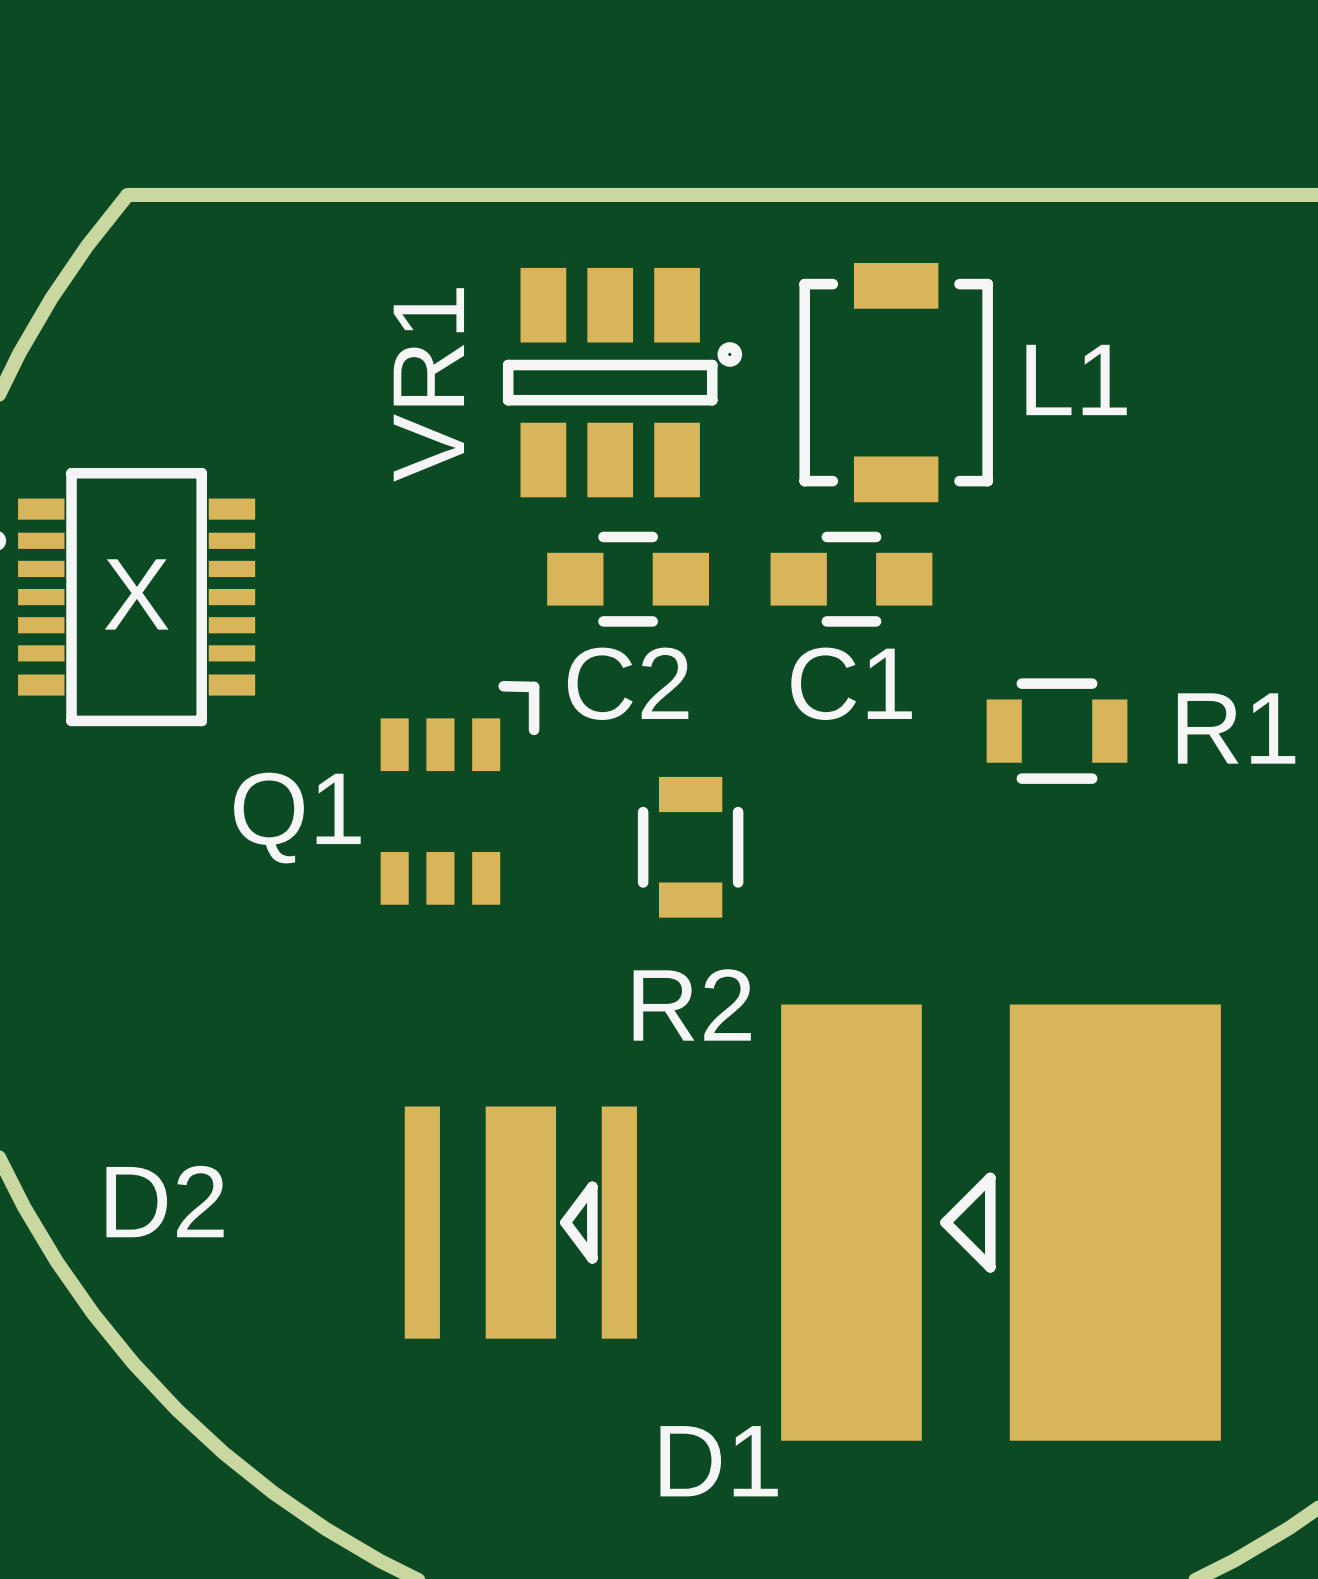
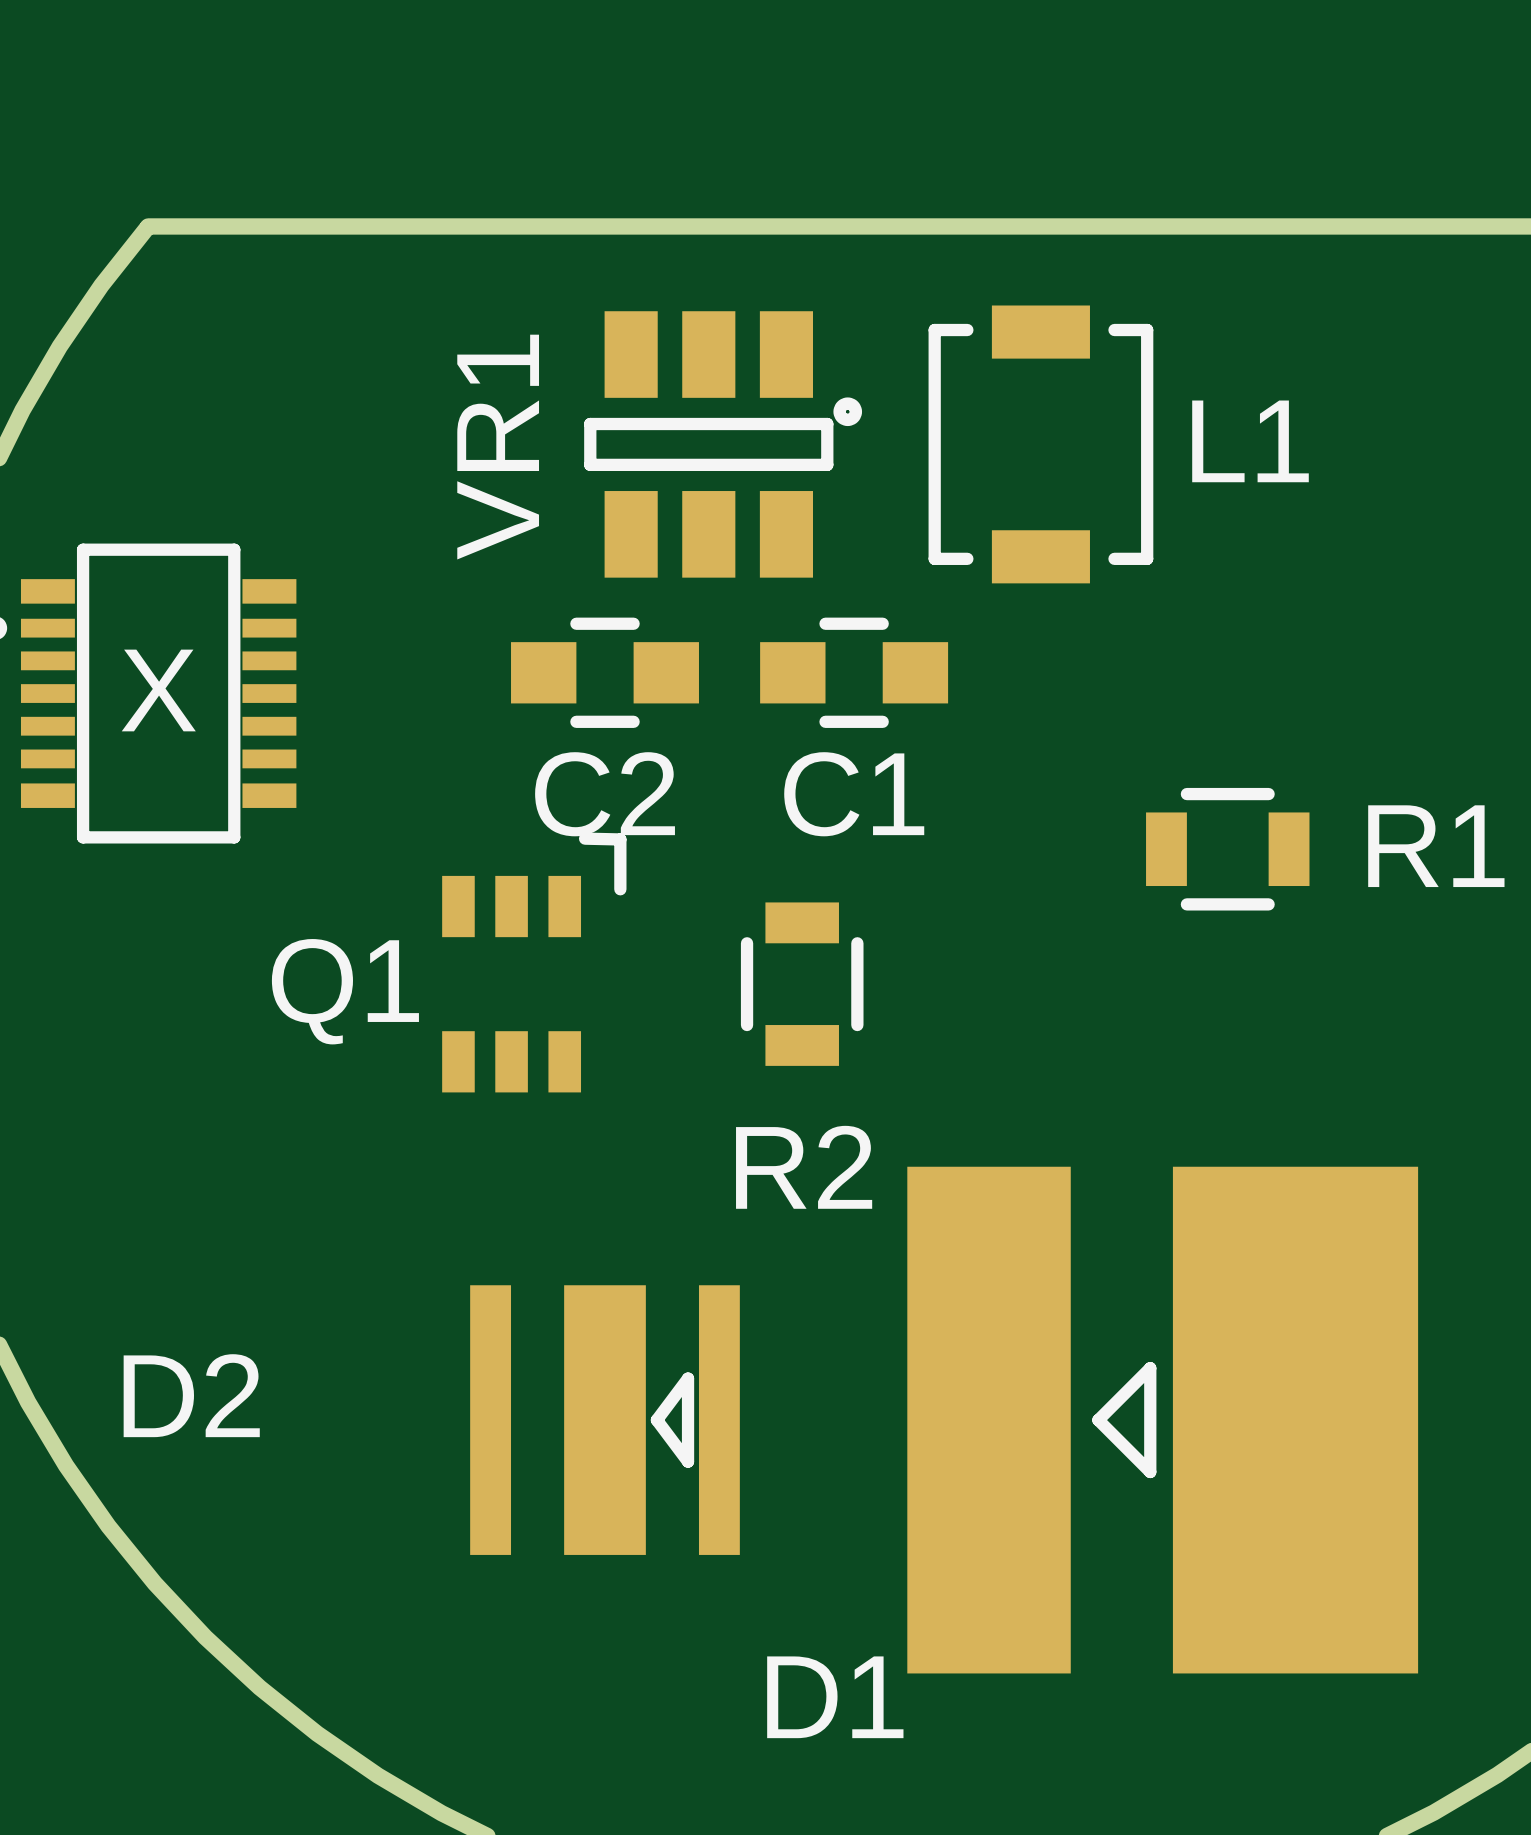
C2 position: (628, 579) -> (605, 672)
C1 position: (851, 579) -> (854, 672)
Q1 position: (460, 792) -> (534, 962)

